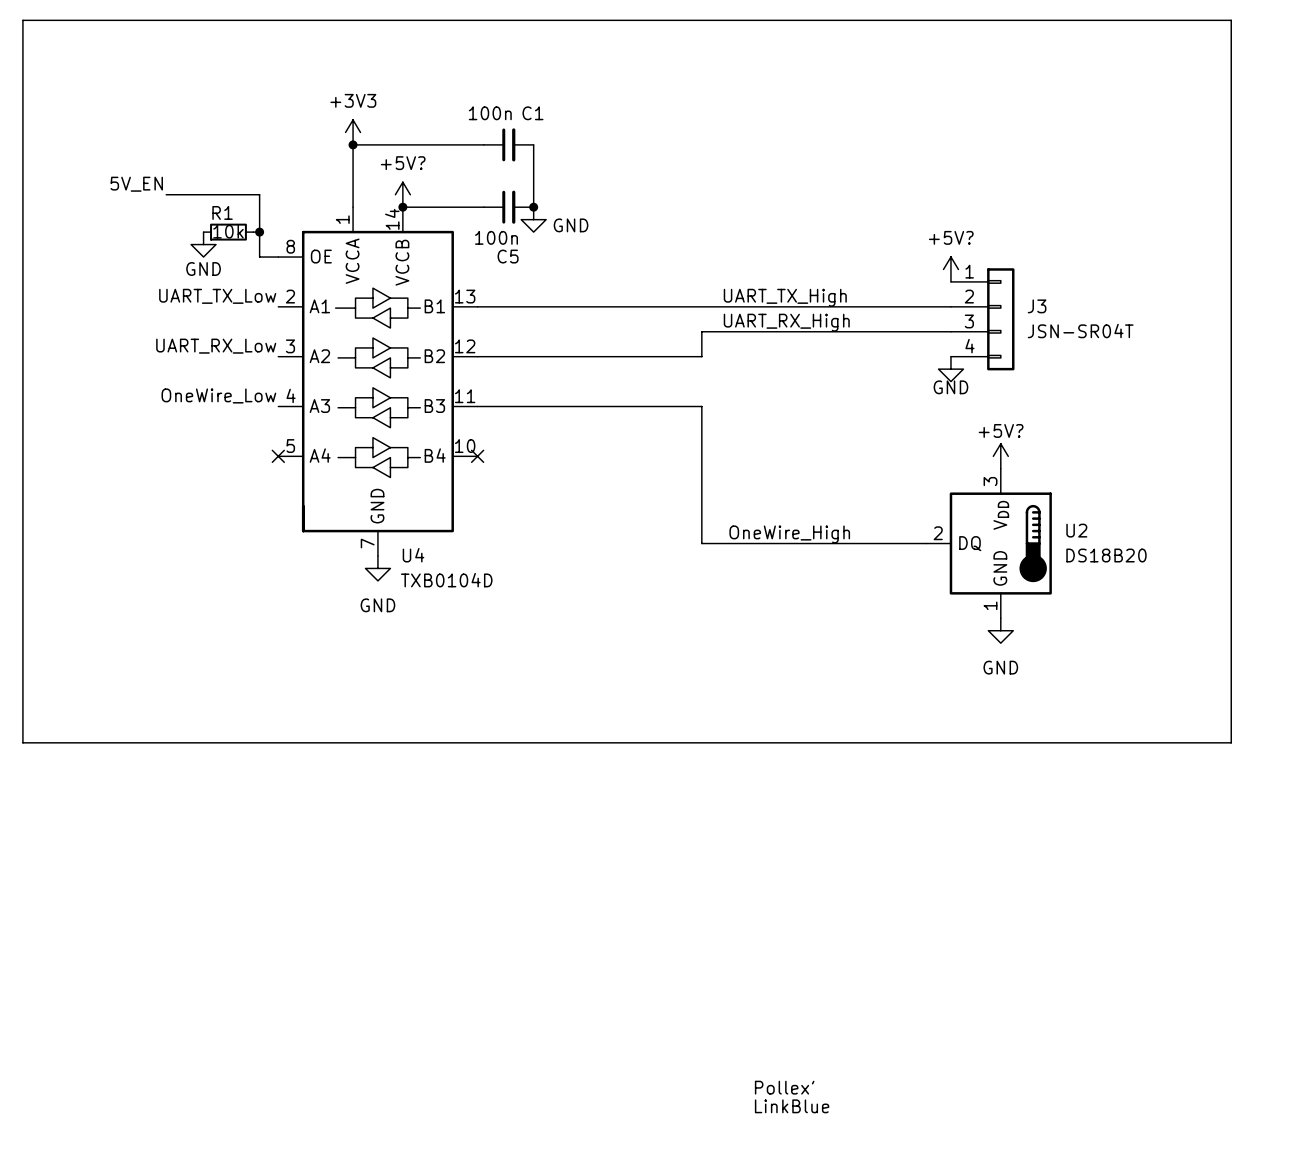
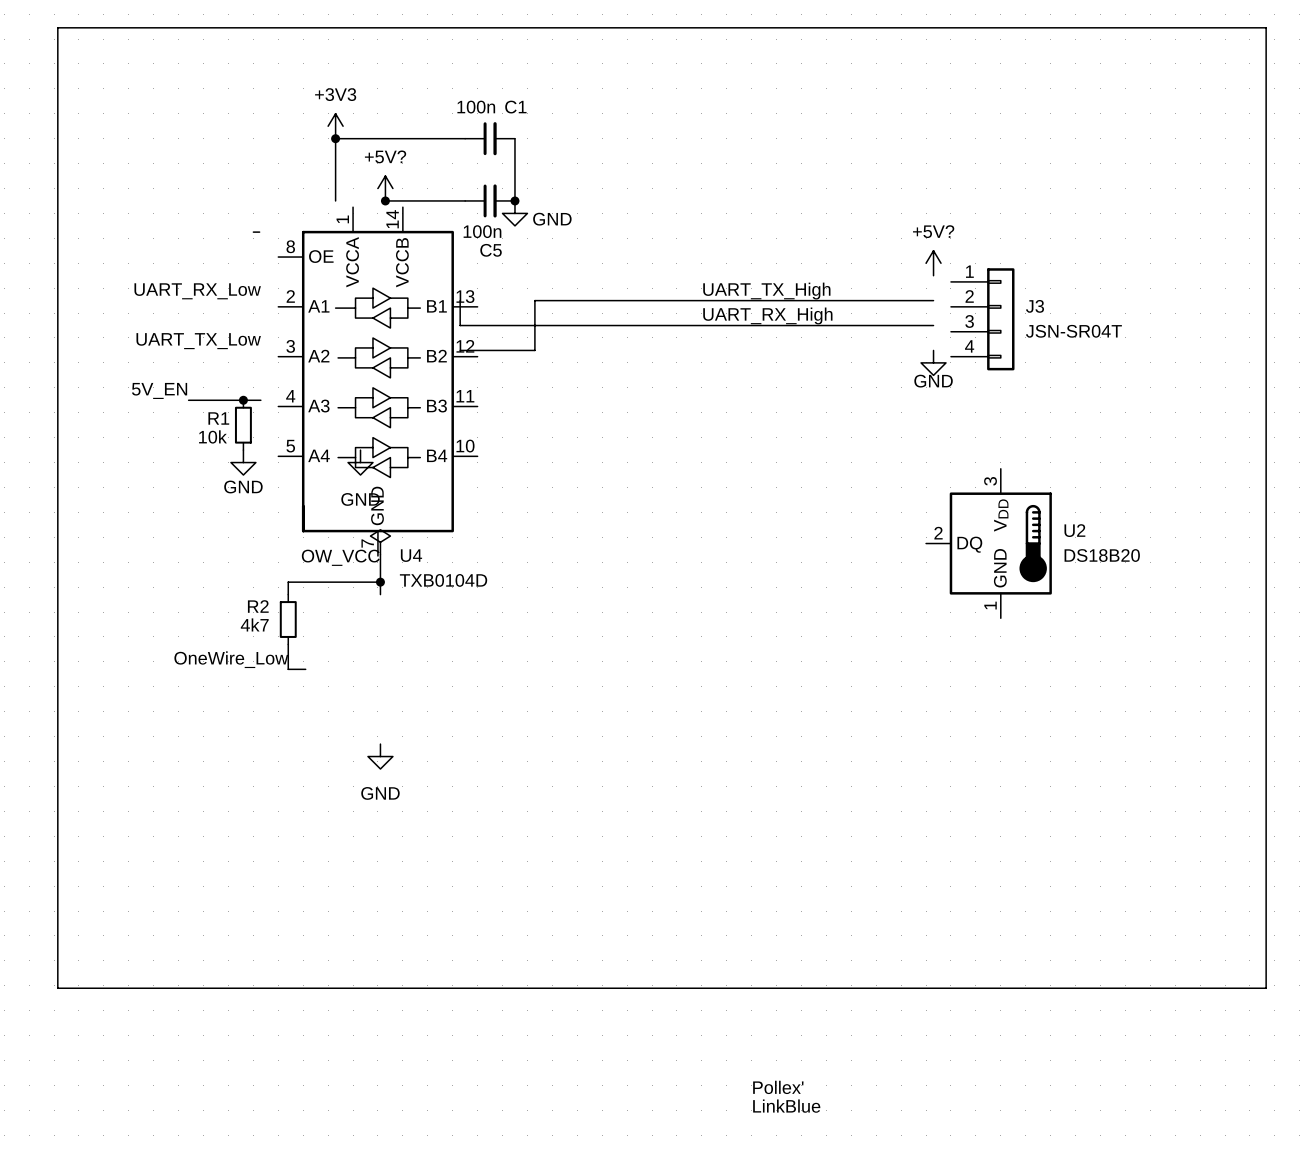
line: (22, 20) (1231, 20) (1231, 742) (22, 742) (22, 20) -> (57, 27) (57, 988) (1266, 988) (1266, 27) (57, 27)
power symbol position: +3V3 (353, 132) -> +3V3 (335, 126)
wire: none -> (465, 138) (335, 138) (335, 200)
junction position: (353, 144) -> (335, 138)
wire: (483, 144) (353, 144) (353, 207) -> none
C1 position: (508, 144) -> (490, 138)
wire: (533, 144) (533, 207) -> (514, 138) (514, 200)
label: 5V_EN (136, 184) -> none
wire: (166, 194) (259, 194) (259, 257) (278, 257) -> none
power symbol position: +5V? (402, 194) -> +5V? (385, 188)
wire: none -> (385, 200) (465, 200)
wire: (402, 207) (483, 207) -> none
junction position: (402, 207) -> (385, 200)
C5 position: (508, 207) -> (490, 200)
junction position: (533, 207) -> (514, 200)
R1 name position: R1 (222, 212) -> R1 (218, 418)
power symbol position: GND (533, 219) -> GND (514, 213)
R1 value position: 10k (228, 231) -> 10k (212, 436)
R1 rotation: 0° (228, 232) -> 90° clockwise (243, 425)
R1 position: (228, 232) -> (243, 425)
junction: (259, 232) -> none
power symbol: GND (203, 244) -> none
power symbol position: +5V? (950, 269) -> +5V? (933, 263)
label position: UART_TX_Low (217, 296) -> UART_TX_Low (198, 341)
label position: UART_TX_High (785, 297) -> UART_TX_High (766, 291)
wire: none -> (460, 300) (460, 325) (933, 325)
wire: none -> (933, 300) (534, 300) (534, 350) (460, 350)
wire: (477, 306) (950, 306) -> none
label position: UART_RX_High (786, 322) -> UART_RX_High (767, 315)
wire: (950, 331) (701, 331) (701, 356) (477, 356) -> none
label position: UART_RX_Low (216, 346) -> UART_RX_Low (197, 291)
power symbol position: GND (950, 369) -> GND (933, 362)
label: none -> 5V_EN (159, 390)
label: OneWire_Low (218, 395) -> none
wire: none -> (188, 400) (260, 400)
junction: none -> (243, 400)
wire: (477, 406) (701, 406) (701, 543) (926, 543) -> none
no-connect mark: (278, 456) -> none
no-connect mark: (477, 456) -> none
power symbol: +5V? (1000, 456) -> none
power symbol: none -> GND (243, 462)
power symbol: none -> GND (360, 462)
label: OneWire_High (789, 534) -> none
power symbol: none -> (380, 542)
wire: none -> (380, 554) (380, 594)
label: none -> OW_VCC (340, 557)
power symbol: GND (377, 568) -> none
wire: none -> (380, 582) (288, 582) (288, 594)
junction: none -> (380, 582)
R2: none -> 4k7 (288, 619)
power symbol: GND (1000, 630) -> none
wire: none -> (288, 644) (288, 669) (305, 669)
label: none -> OneWire_Low (231, 659)
power symbol: none -> GND (380, 756)

